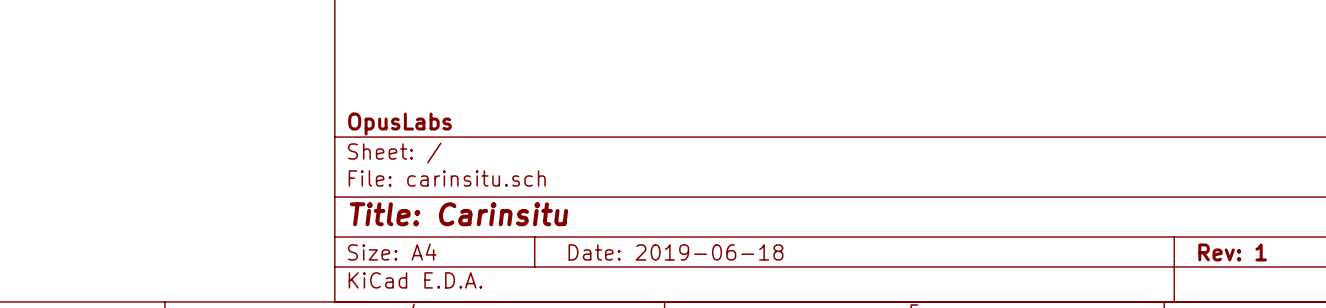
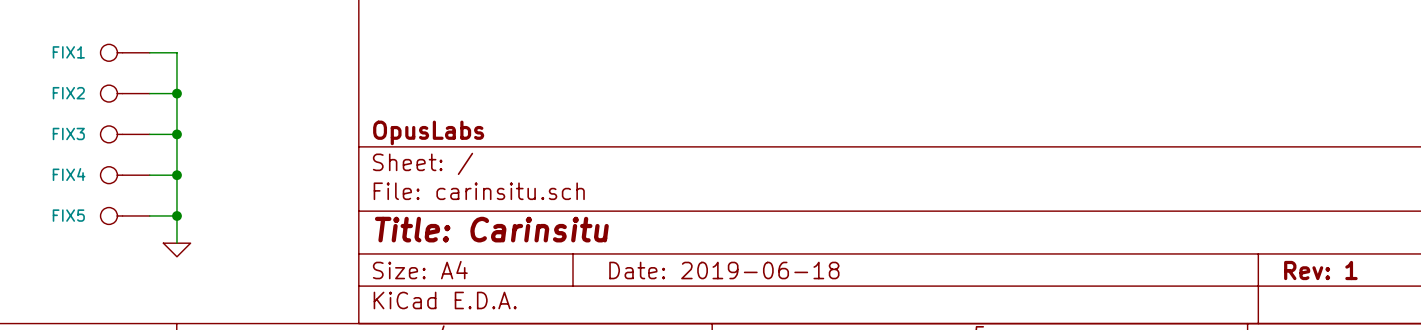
FIX1: none -> (125, 52)
wire: none -> (149, 52) (176, 52) (176, 243)
FIX2: none -> (125, 93)
wire: none -> (149, 93) (176, 93)
junction: none -> (176, 93)
FIX3: none -> (125, 134)
wire: none -> (149, 134) (176, 134)
junction: none -> (176, 134)
FIX4: none -> (125, 175)
wire: none -> (149, 175) (176, 175)
junction: none -> (176, 175)
FIX5: none -> (125, 215)
wire: none -> (149, 215) (176, 215)
junction: none -> (176, 215)
power symbol: none -> (176, 249)

